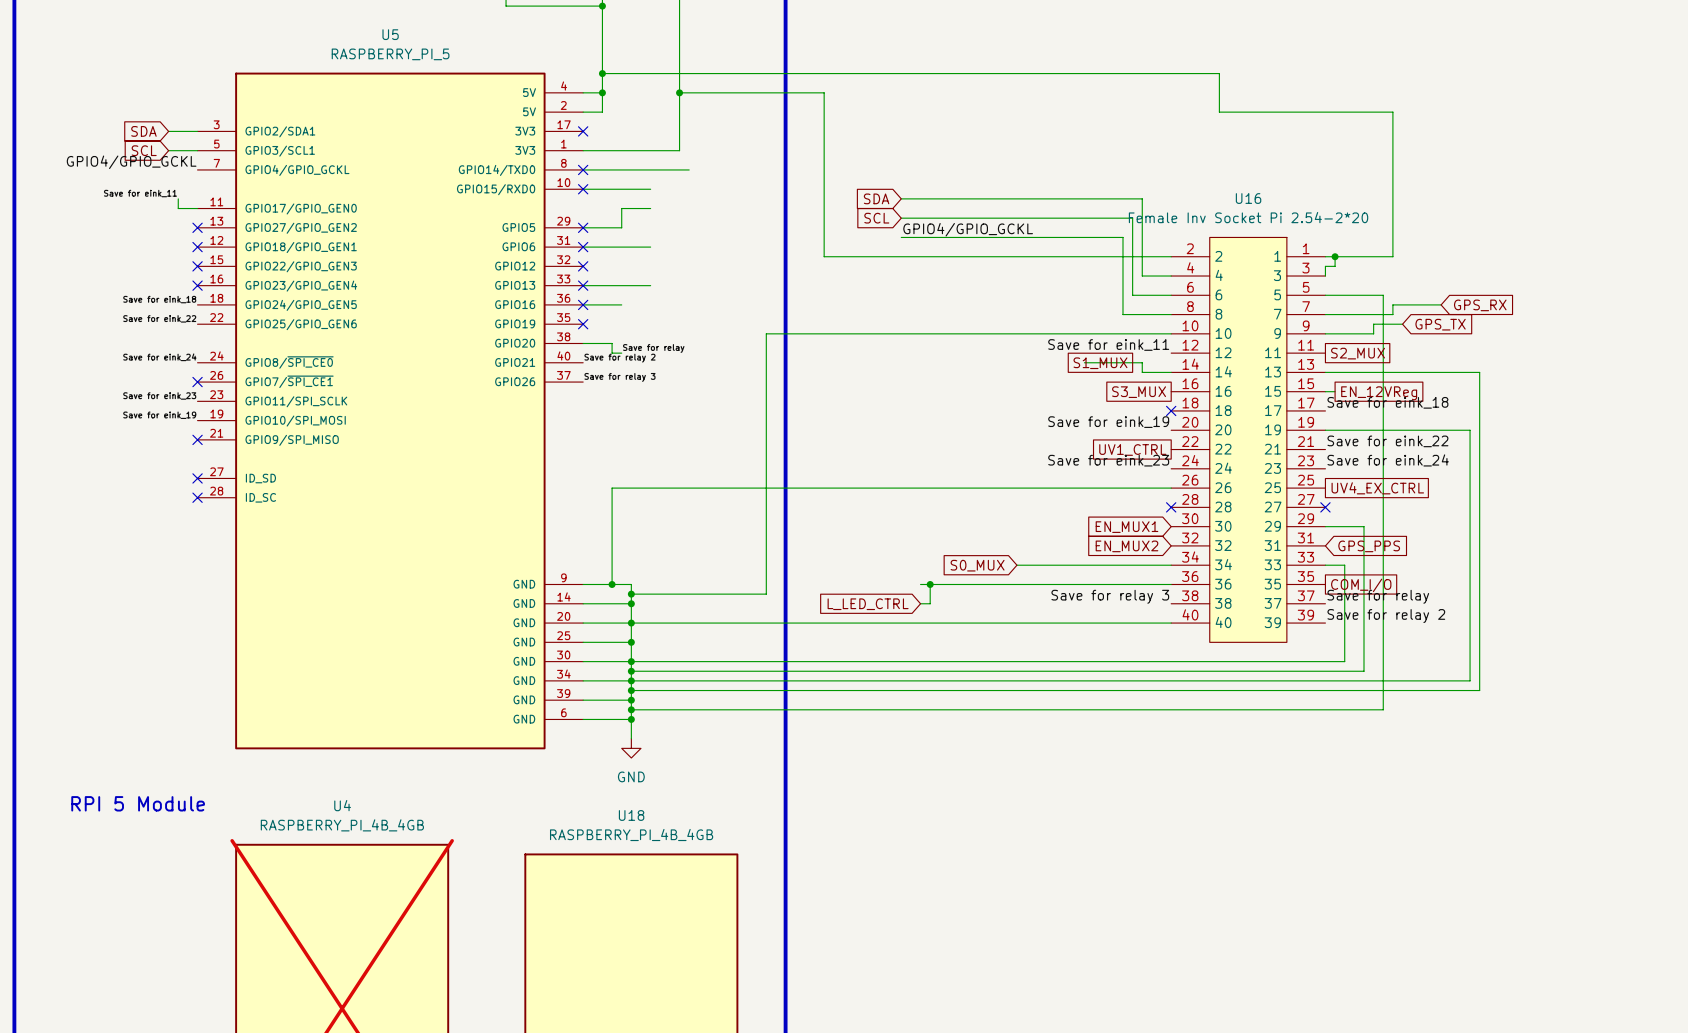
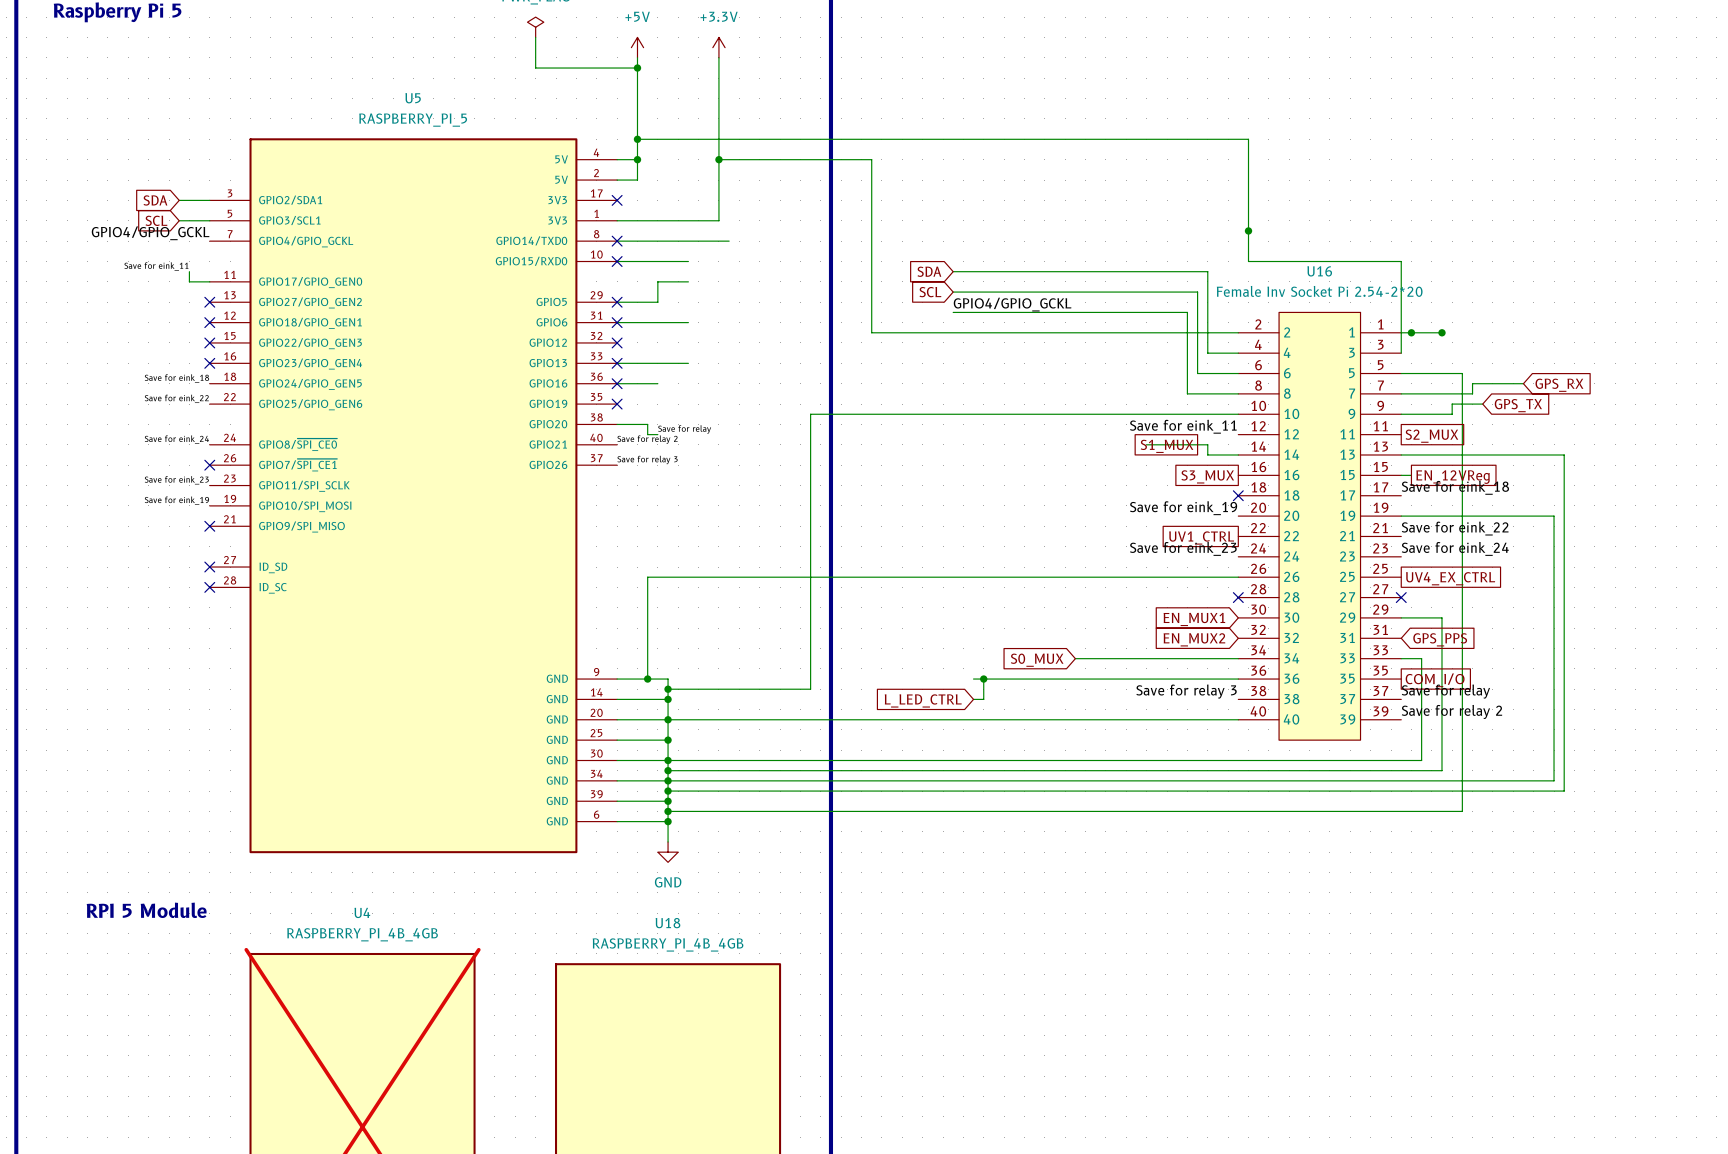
wire: (1180, 73) (1219, 73) (1219, 112) (1392, 112) (1392, 256) (1363, 256) -> (1248, 139) (1248, 261) (1401, 261) (1401, 342)
junction: none -> (1248, 230)
wire: (1335, 256) (1335, 266) (1325, 266) -> none
junction: none -> (1441, 332)

